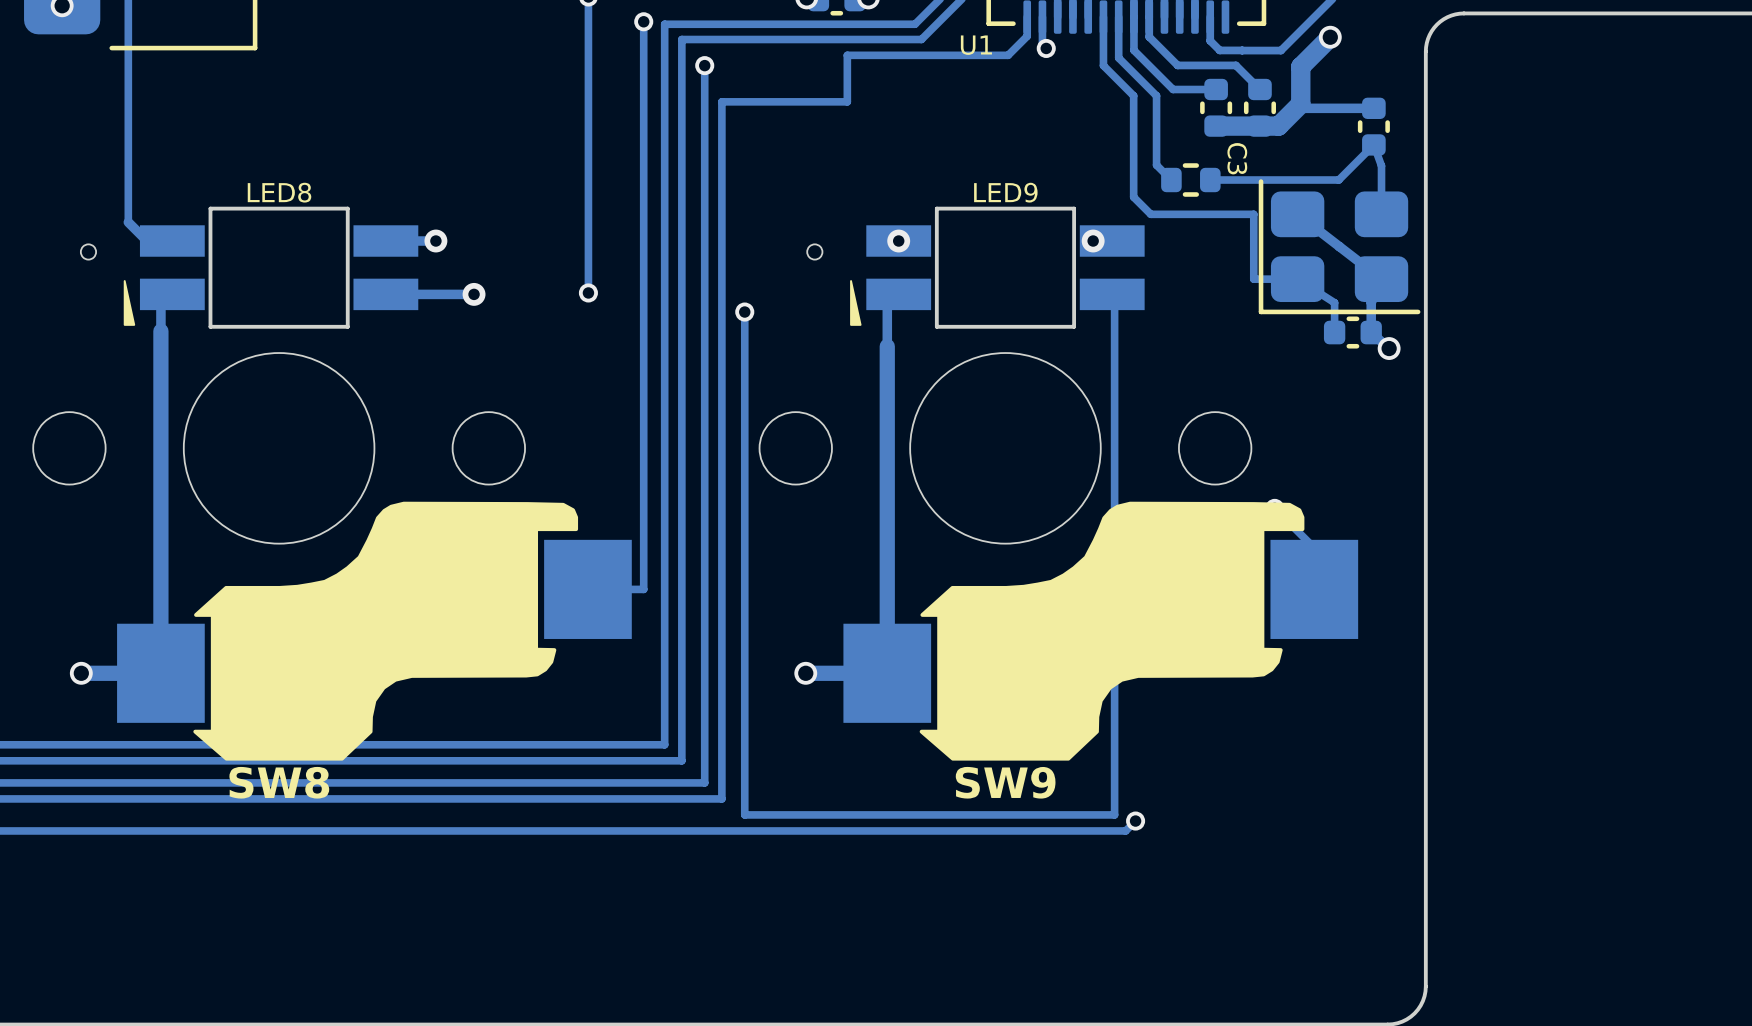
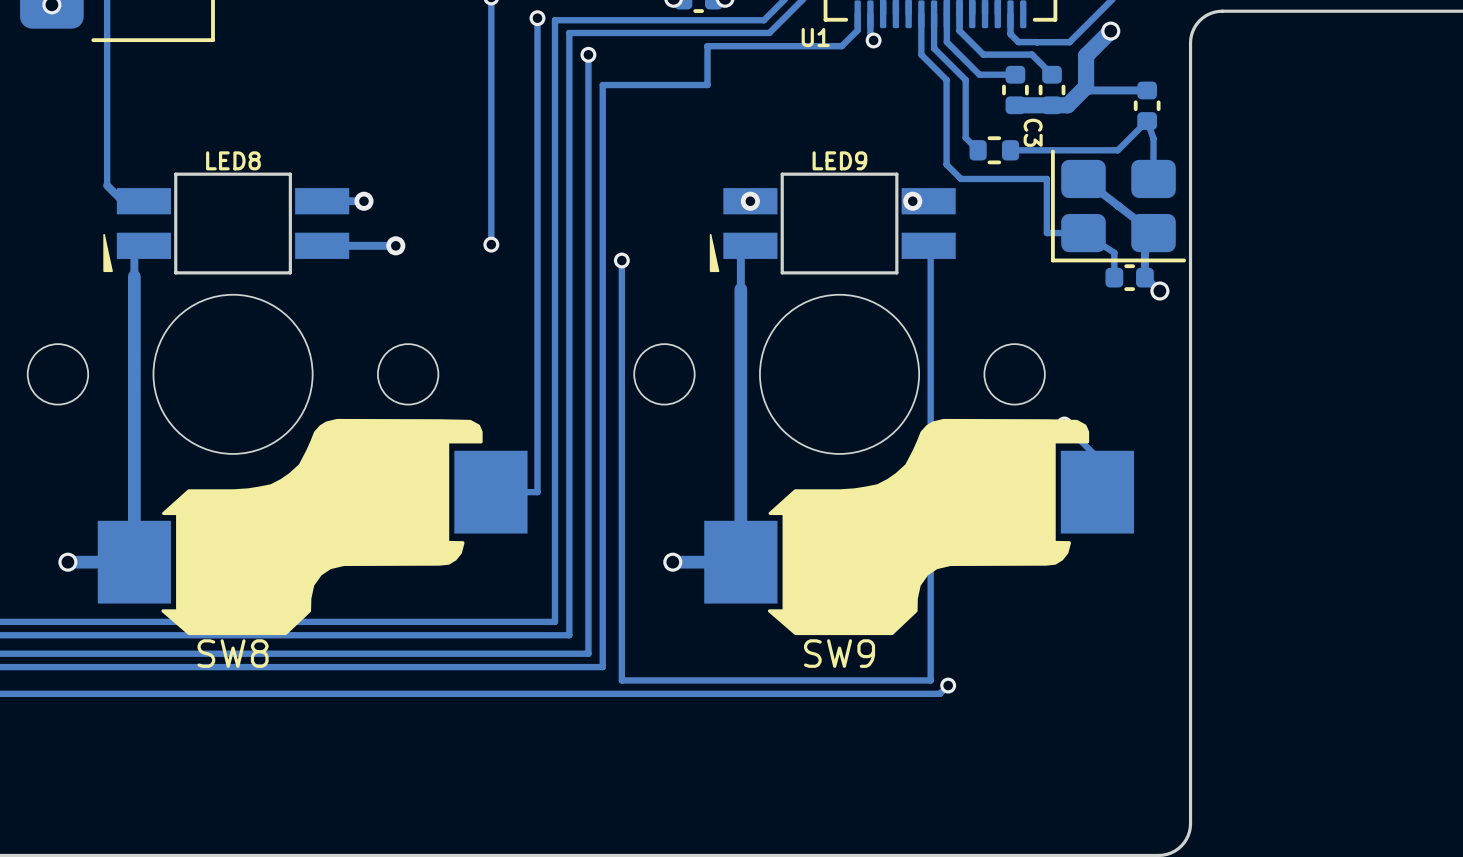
SW8 footprint: [33, 244, 632, 761] -> [27, 294, 528, 636]
SW9 footprint: [759, 244, 1359, 761] -> [634, 294, 1135, 636]

